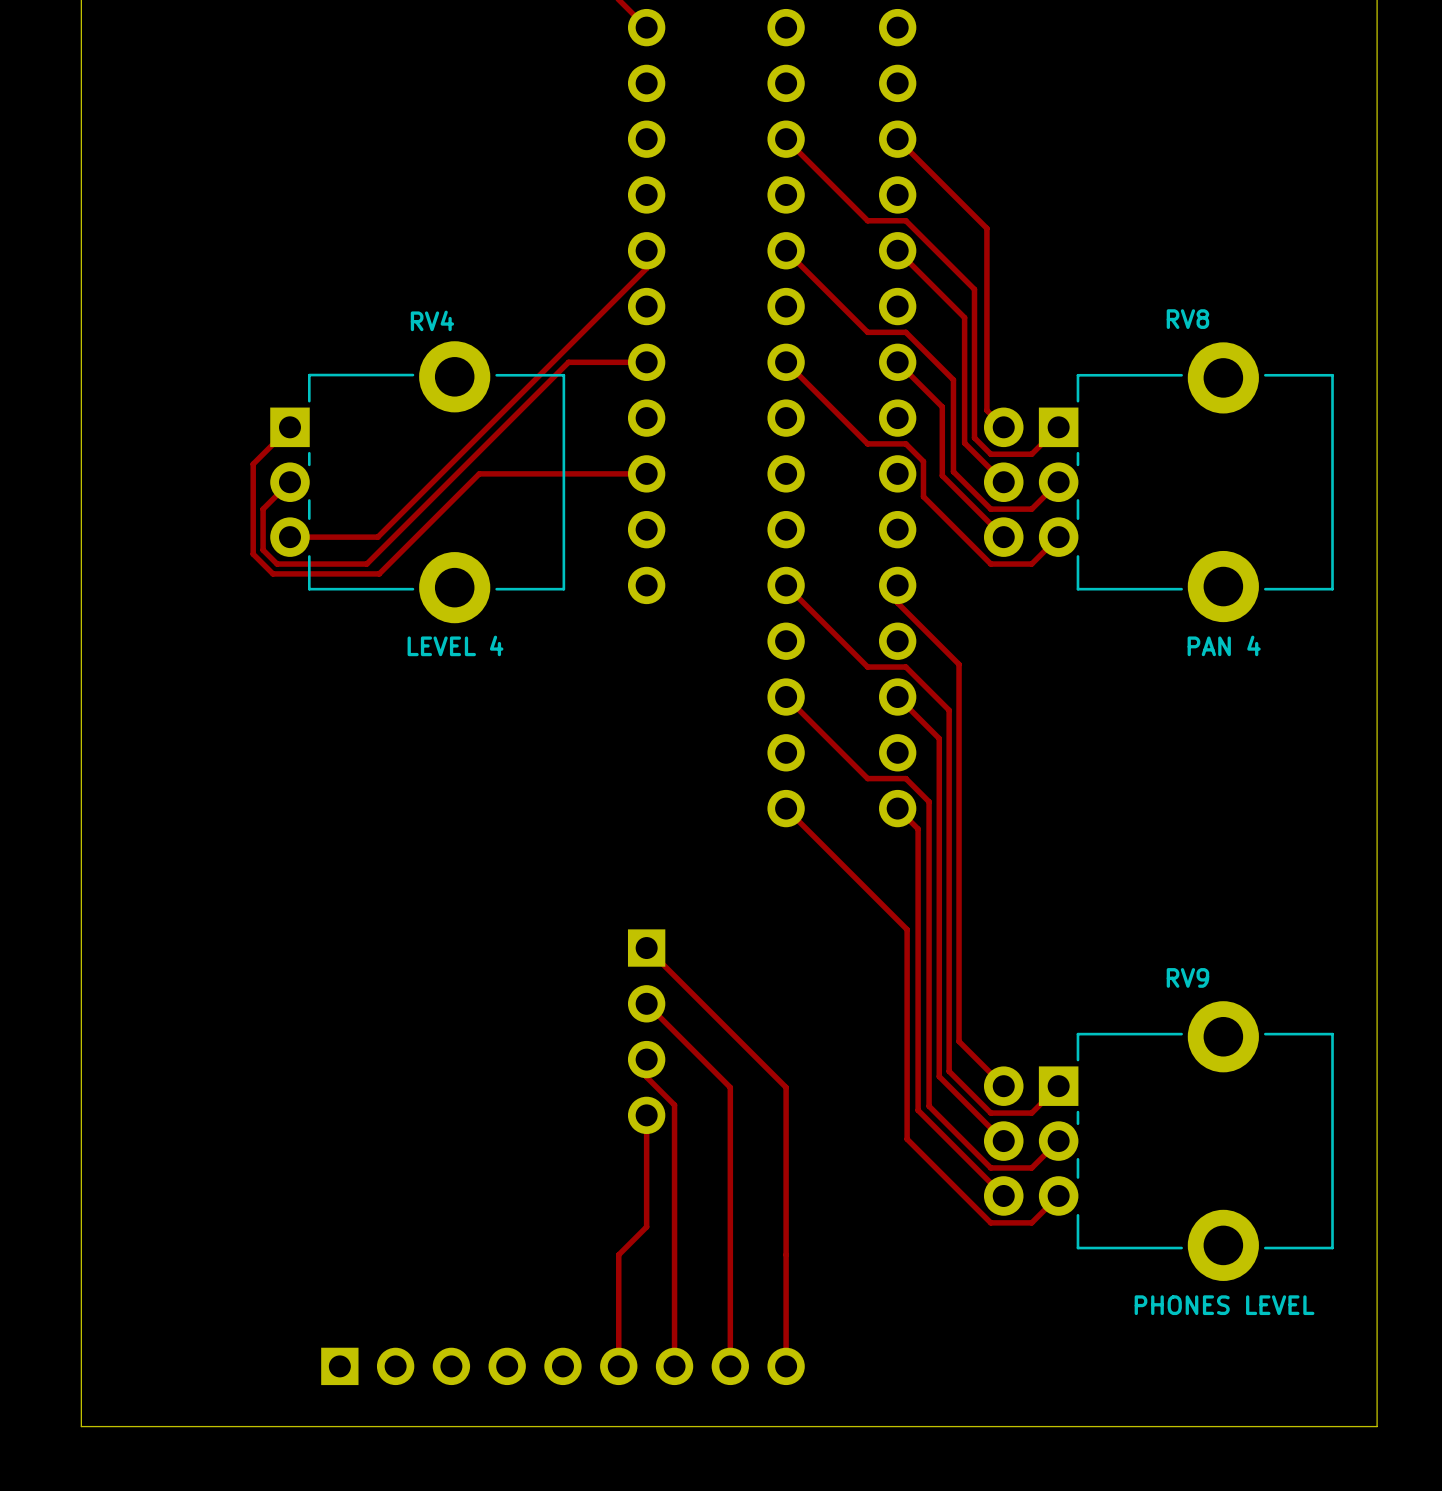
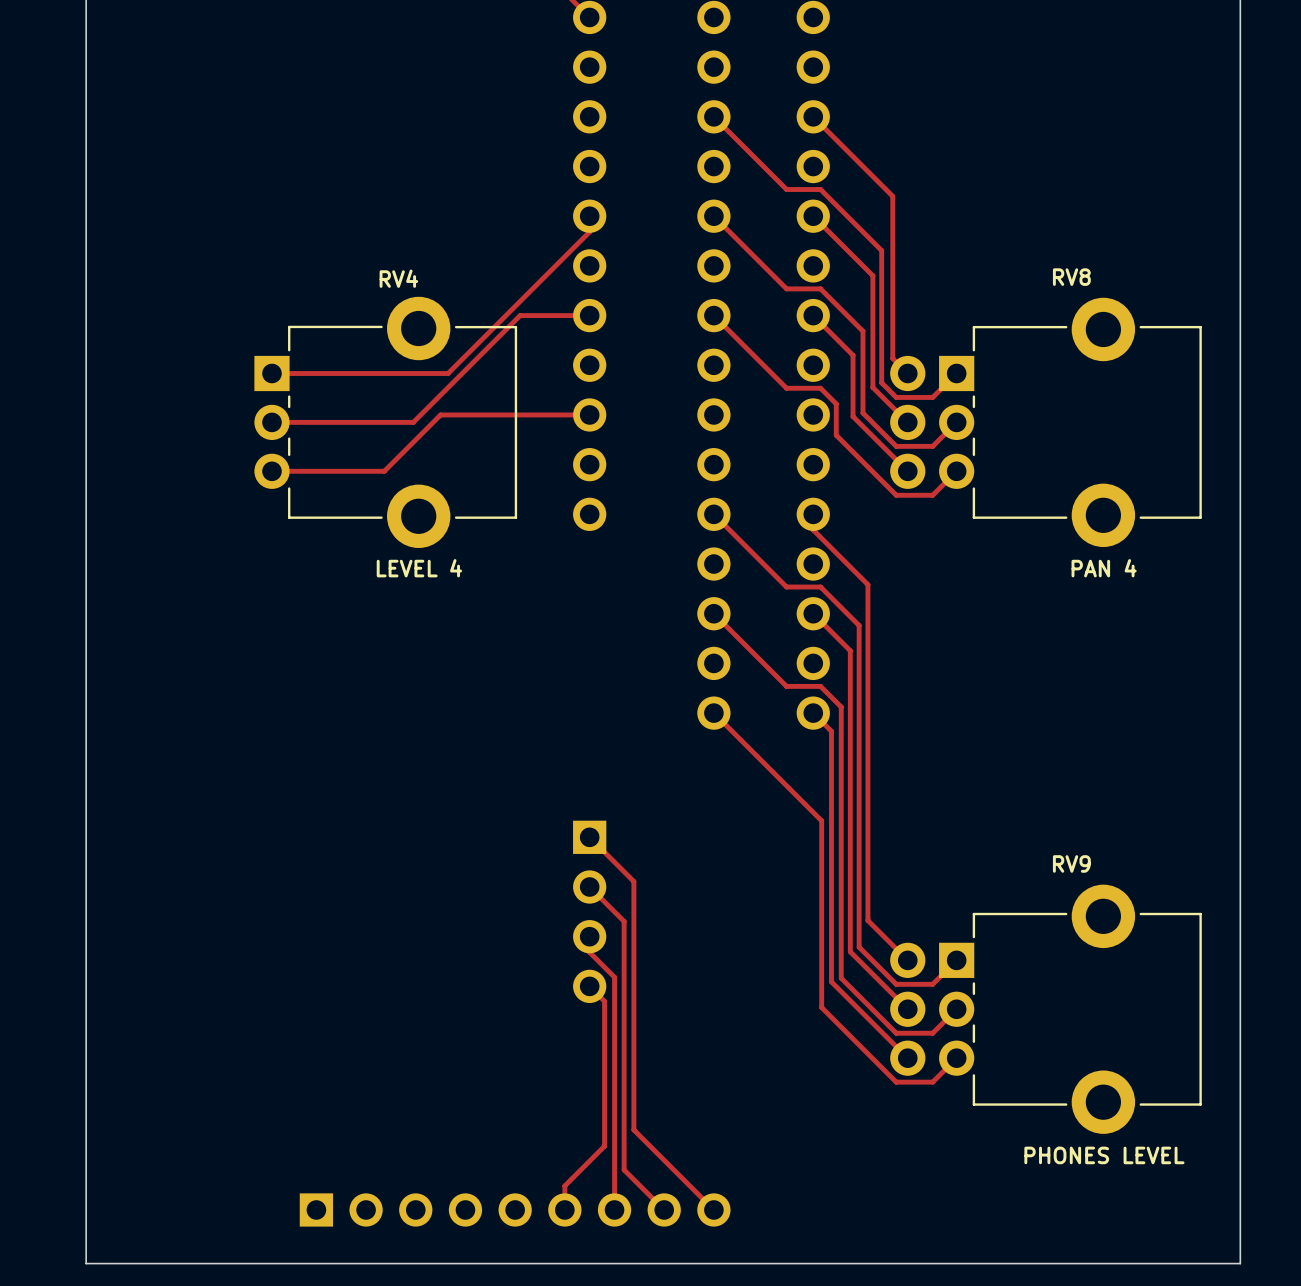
track: (289, 427) (253, 464) (253, 554) (272, 573) (379, 573) (416, 537) -> (271, 373) (448, 373)
track: (487, 427) (377, 537) -> (384, 471) (350, 471)
track: (289, 482) (263, 509) (263, 550) (277, 564) (366, 564) (448, 482) -> (271, 422) (413, 422)
track: (696, 997) (786, 1087) (786, 1366) -> (633, 881) (633, 1129) (713, 1209)
track: (685, 1042) (730, 1087) (730, 1366) -> (624, 921) (624, 1169) (664, 1209)
track: (646, 1115) (646, 1226) (618, 1254) (618, 1339) -> (589, 986) (604, 1001) (604, 1146) (564, 1185)

